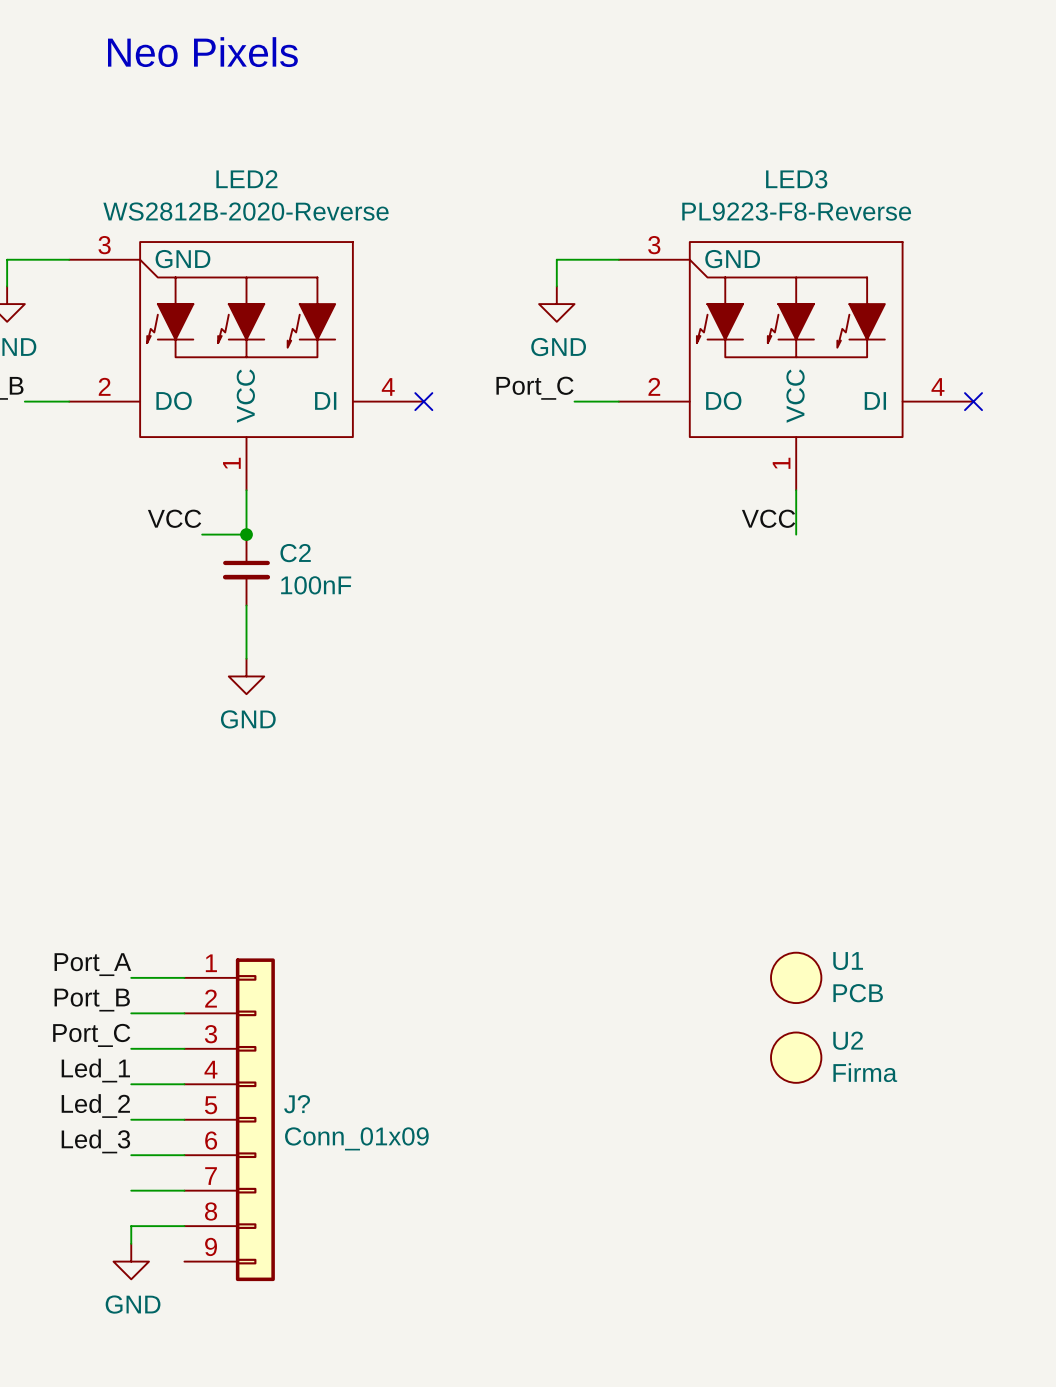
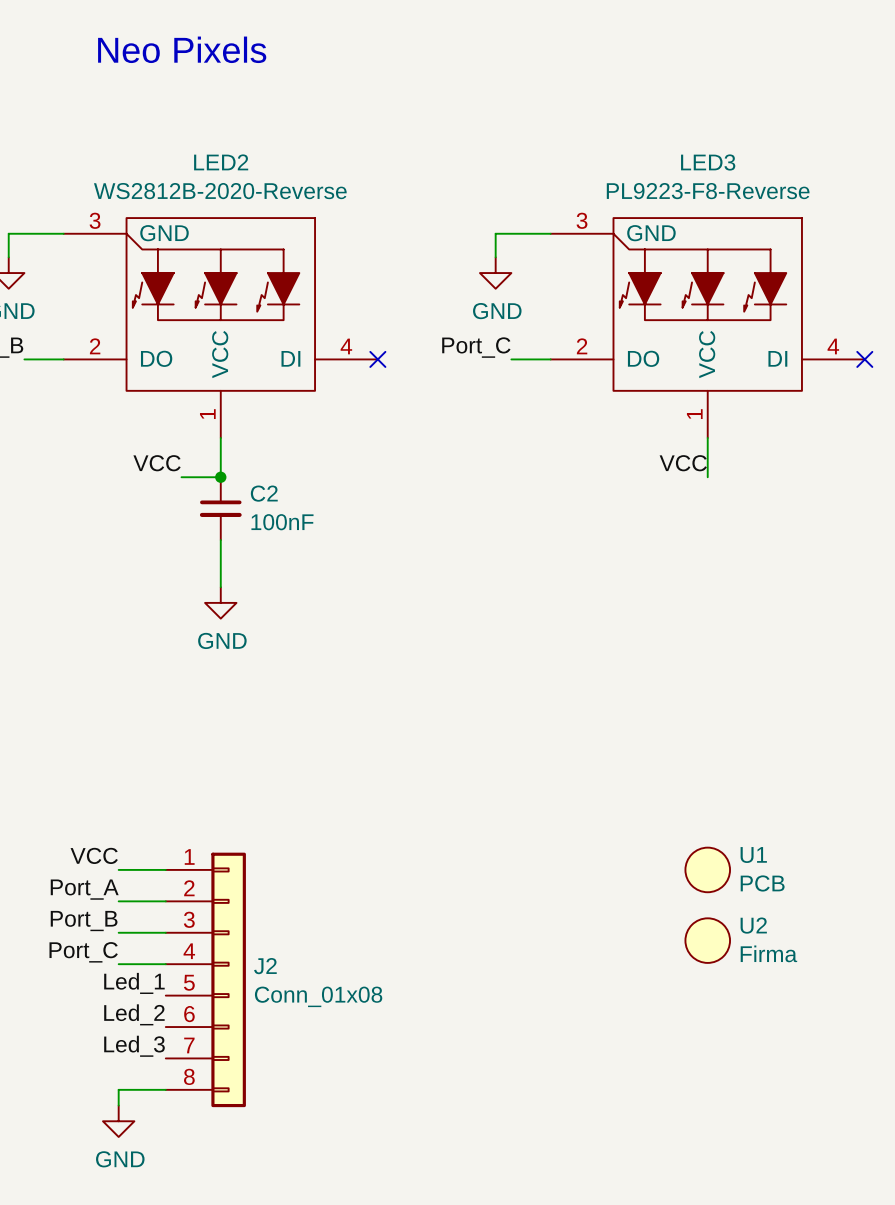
label: Port_A (92, 964) -> VCC (94, 855)
label: Port_B (92, 1000) -> Port_A (84, 889)
label: Port_C (91, 1035) -> Port_B (84, 921)
label: Led_1 (95, 1070) -> Port_C (83, 952)
J2: none -> Conn_01x08 (205, 979)
label position: Led_2 (95, 1106) -> Led_2 (134, 1014)
label: none -> Led_1 (134, 983)
wire: (131, 1119) (184, 1119) -> none
J?: Conn_01x09 (229, 1119) -> none
label position: Led_3 (95, 1141) -> Led_3 (134, 1046)
wire: (131, 1155) (184, 1155) -> none
wire: (131, 1190) (184, 1190) -> none

